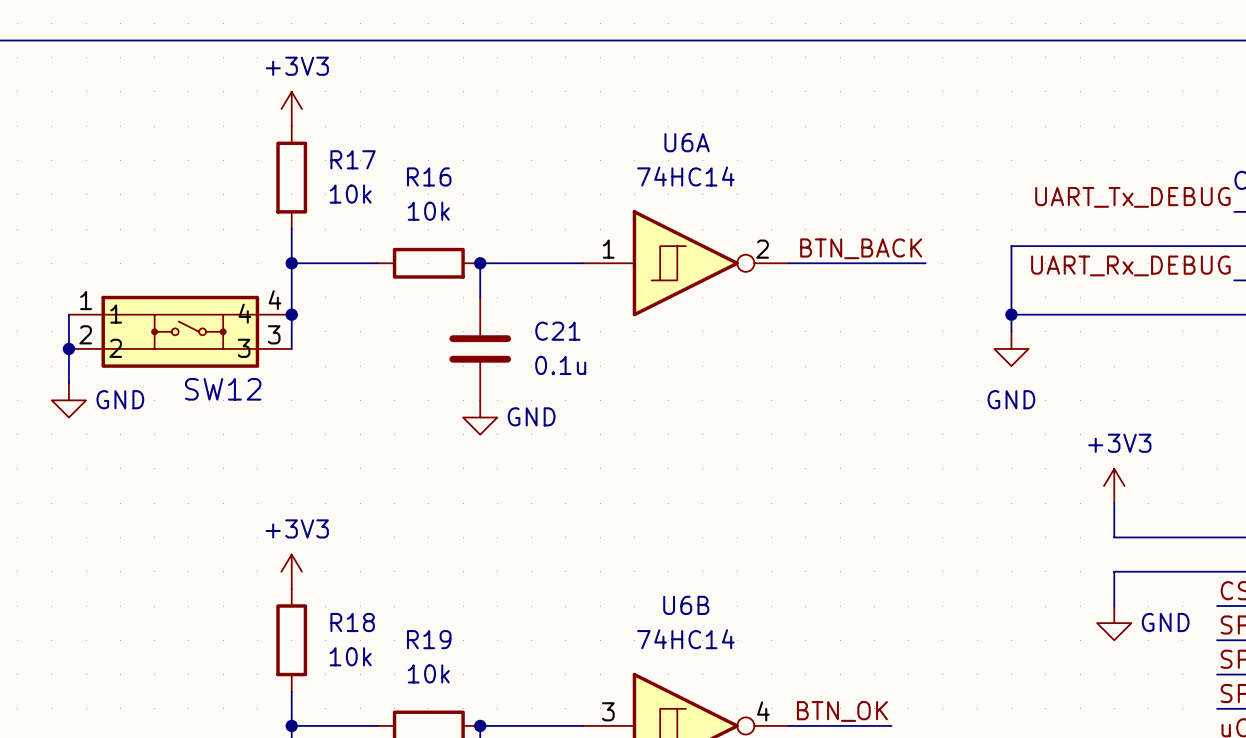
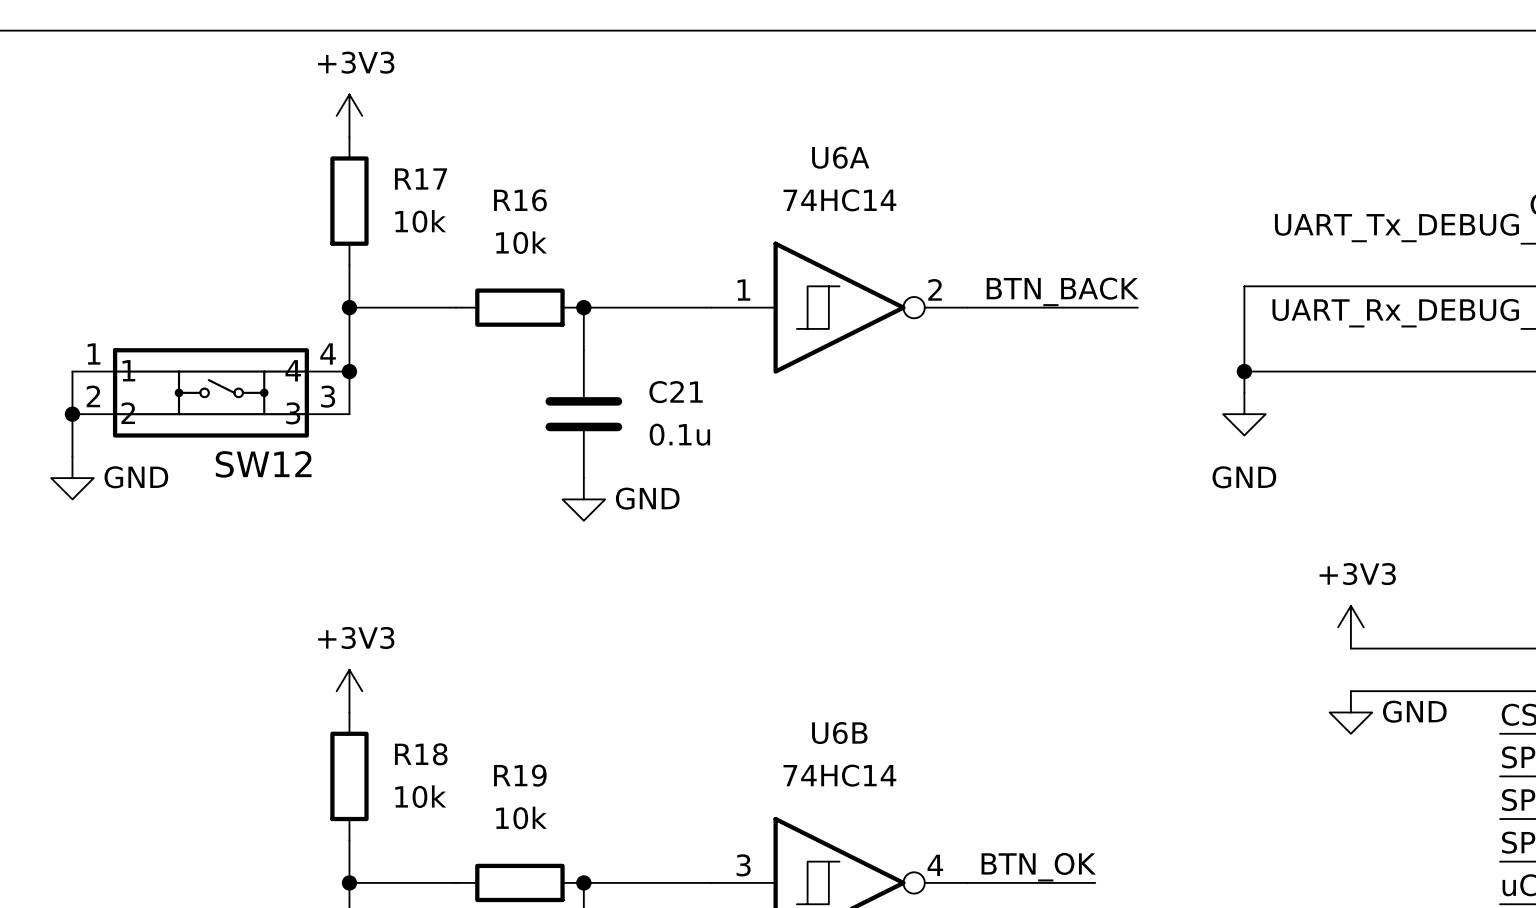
power symbol position: +3V3 (1114, 486) -> +3V3 (1350, 627)
wire: (1114, 503) (1114, 537) -> (1350, 648) (1372, 648)
wire: (1114, 571) (1114, 606) -> (1372, 691) (1350, 691)
power symbol position: GND (1114, 623) -> GND (1350, 712)

